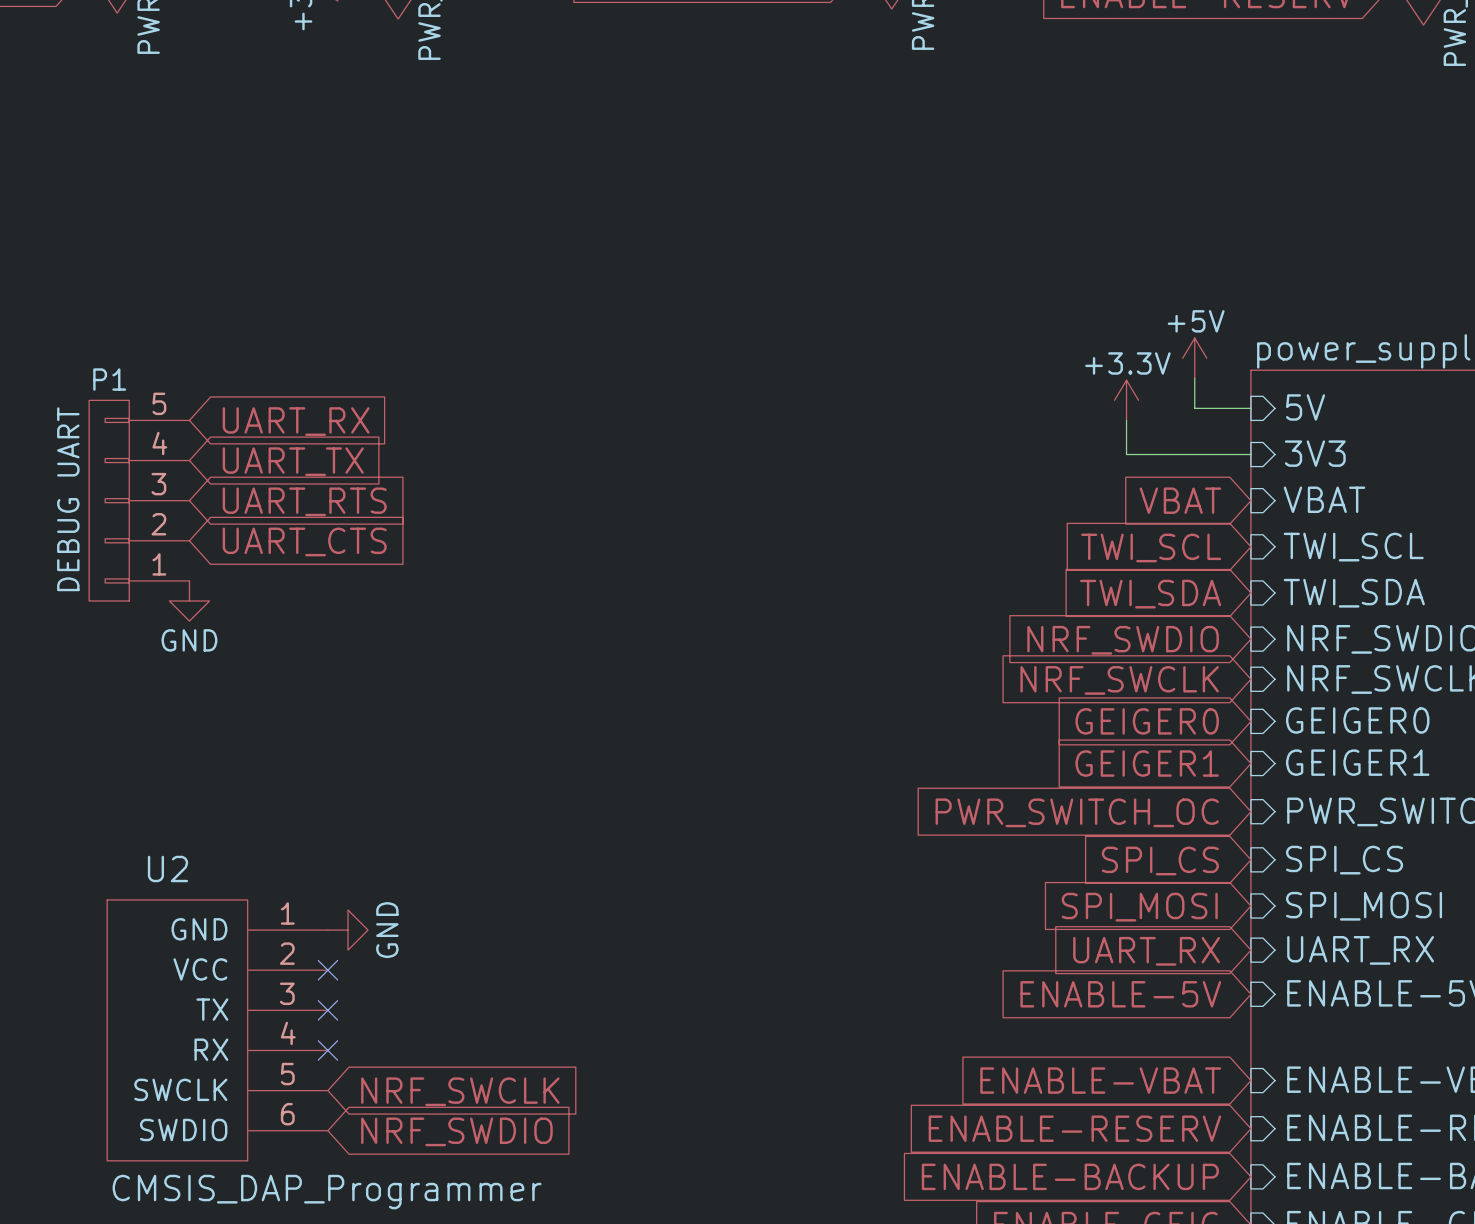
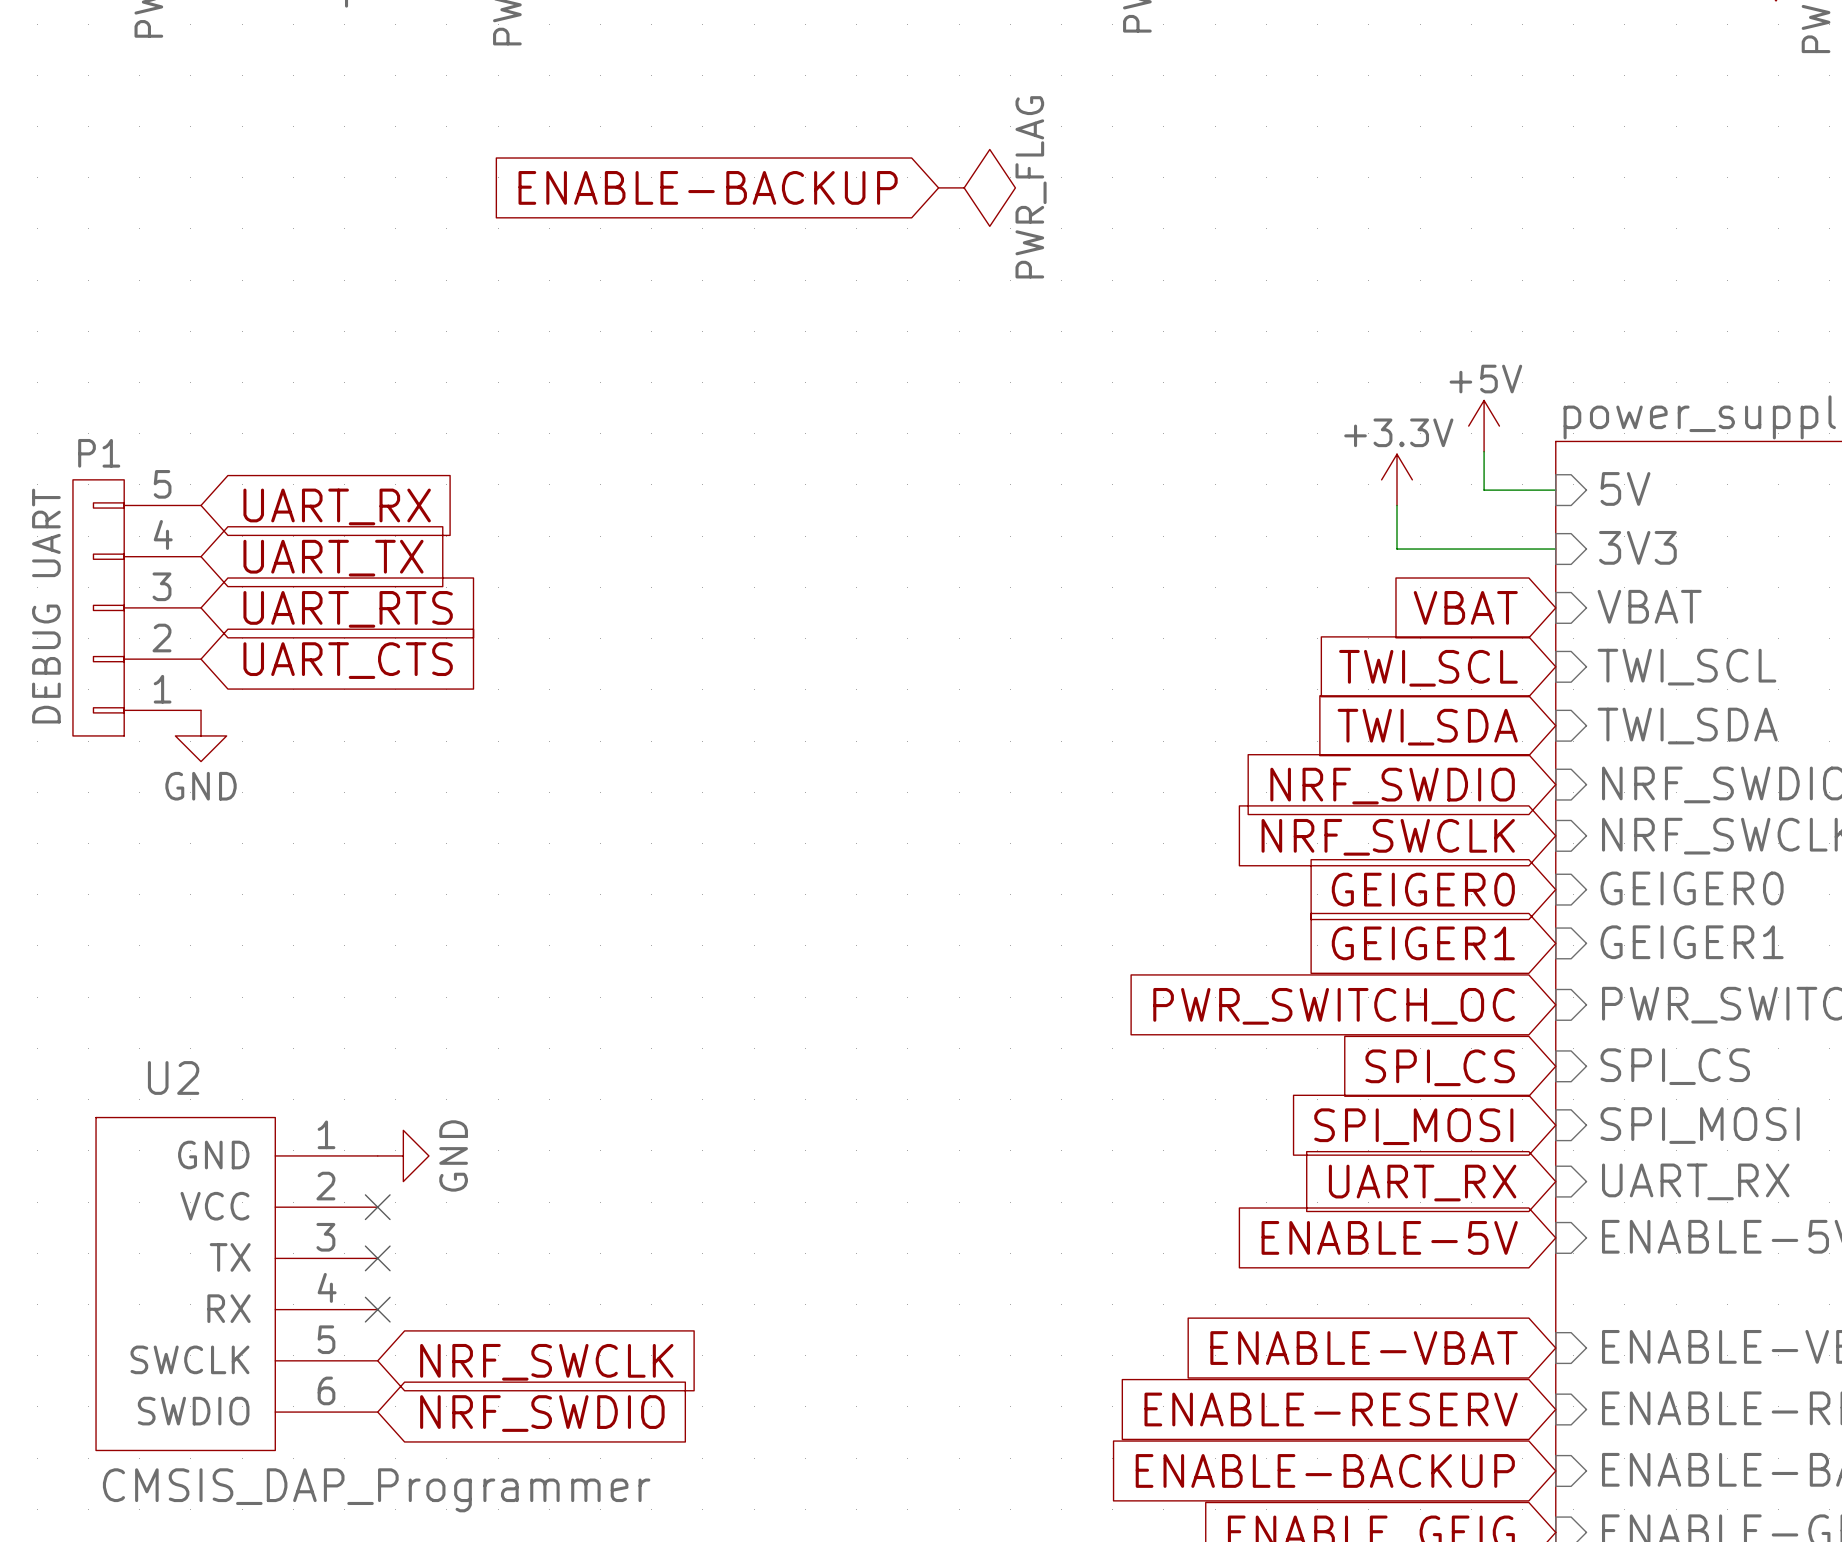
global label: none -> ENABLE-BACKUP (708, 187)
power symbol: none -> PWR_FLAG (977, 187)

